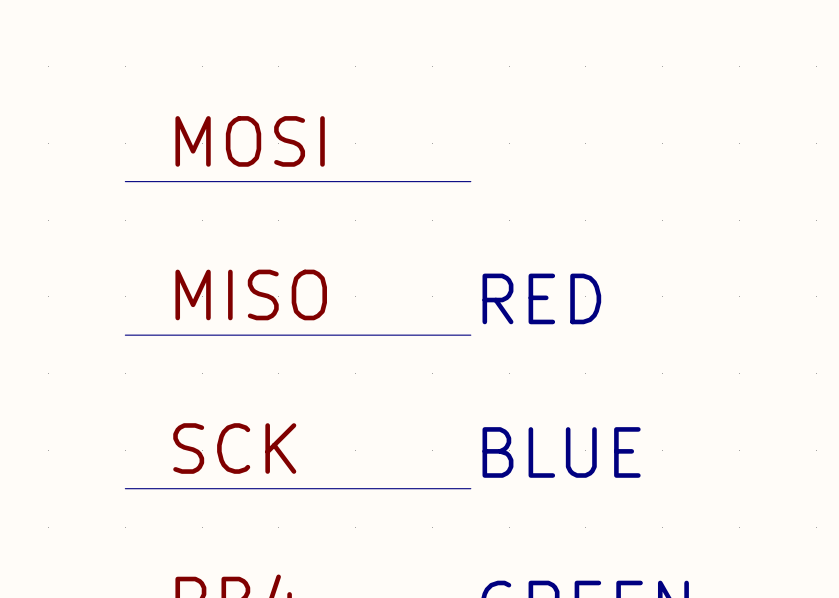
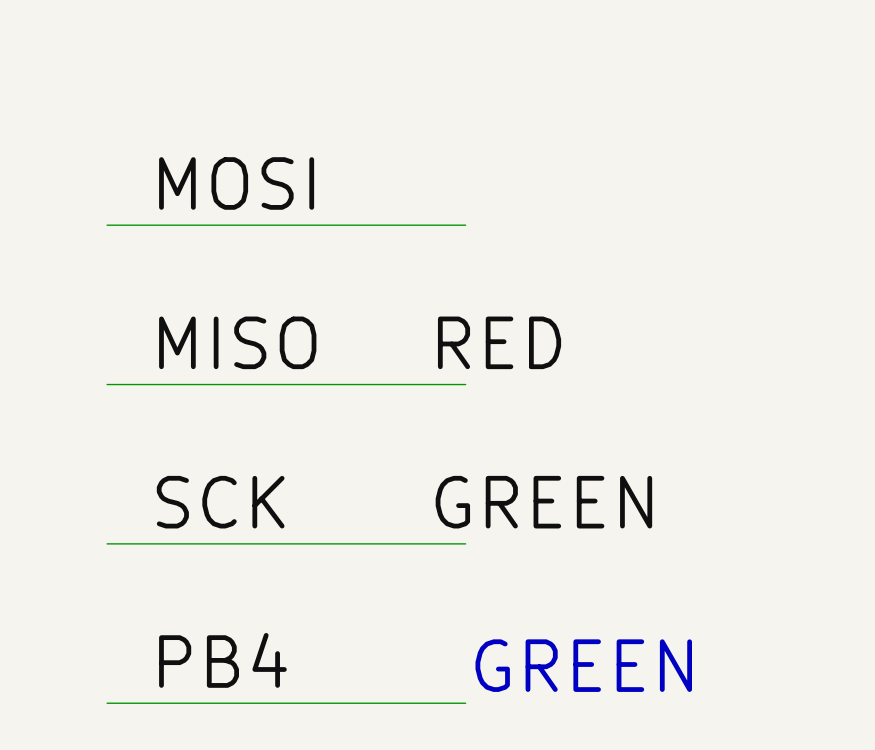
label: none -> RED (499, 342)
text: RED (541, 298) -> none
label: none -> GREEN (543, 502)
text: BLUE (561, 452) -> none

